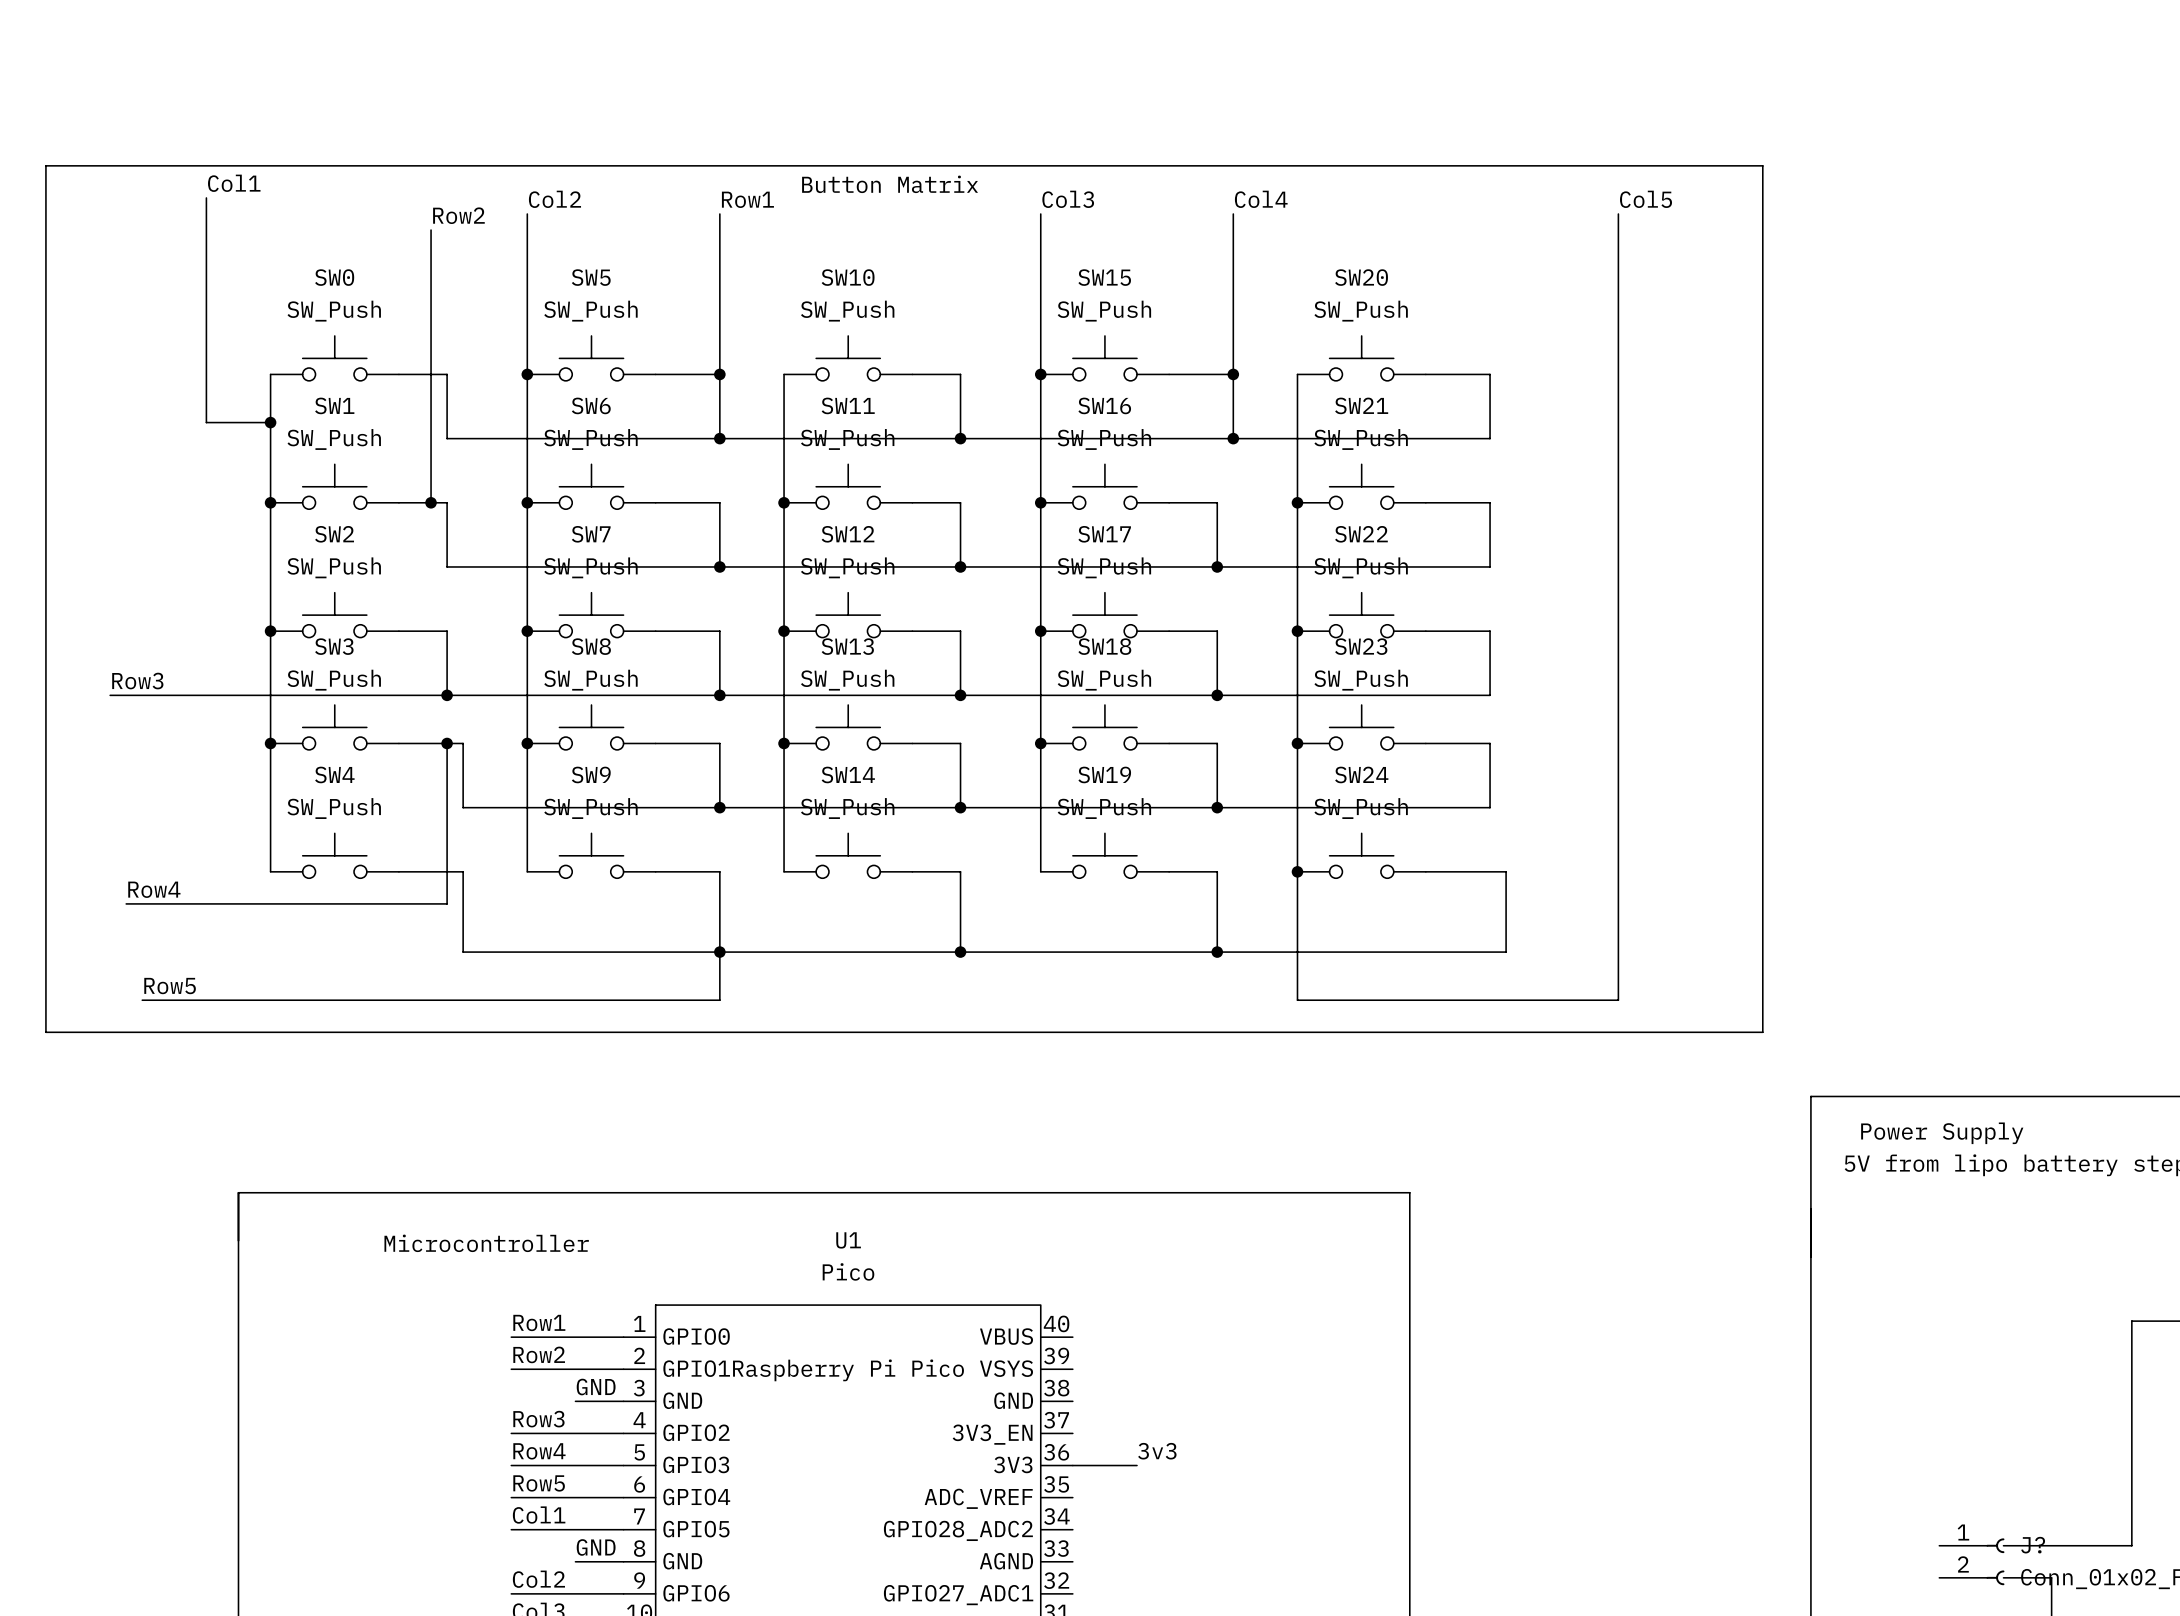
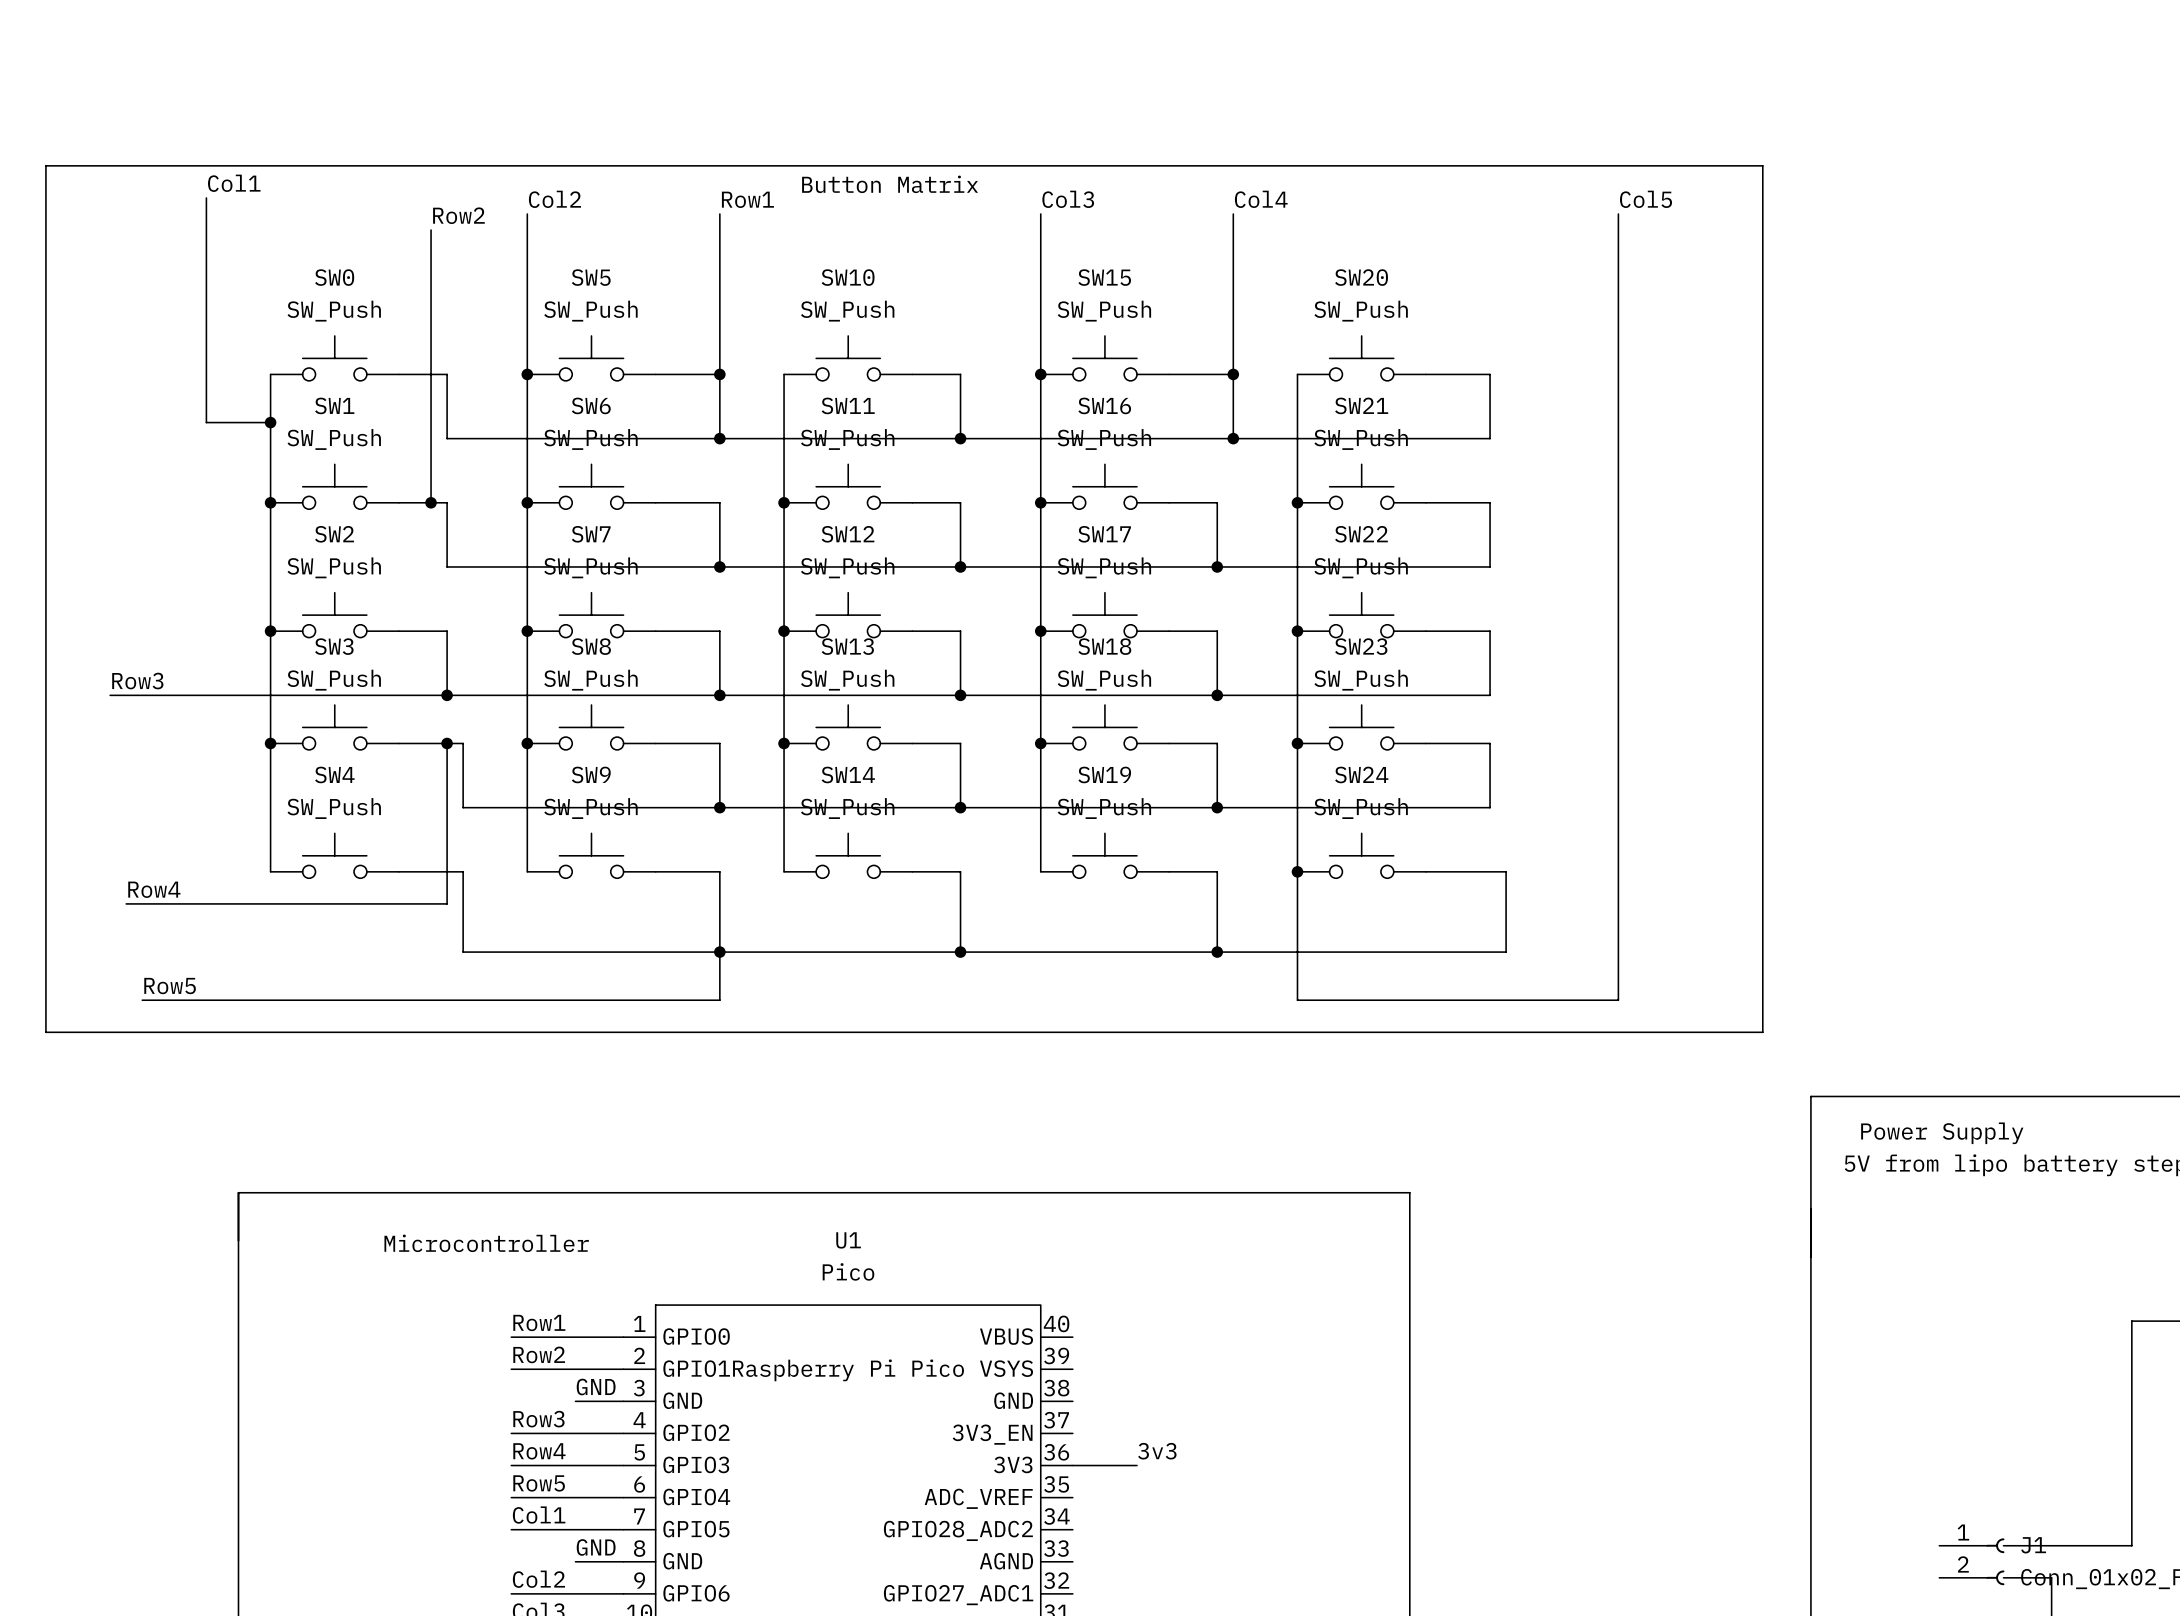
J? name: J? (2033, 1545) -> J1 (2033, 1545)

